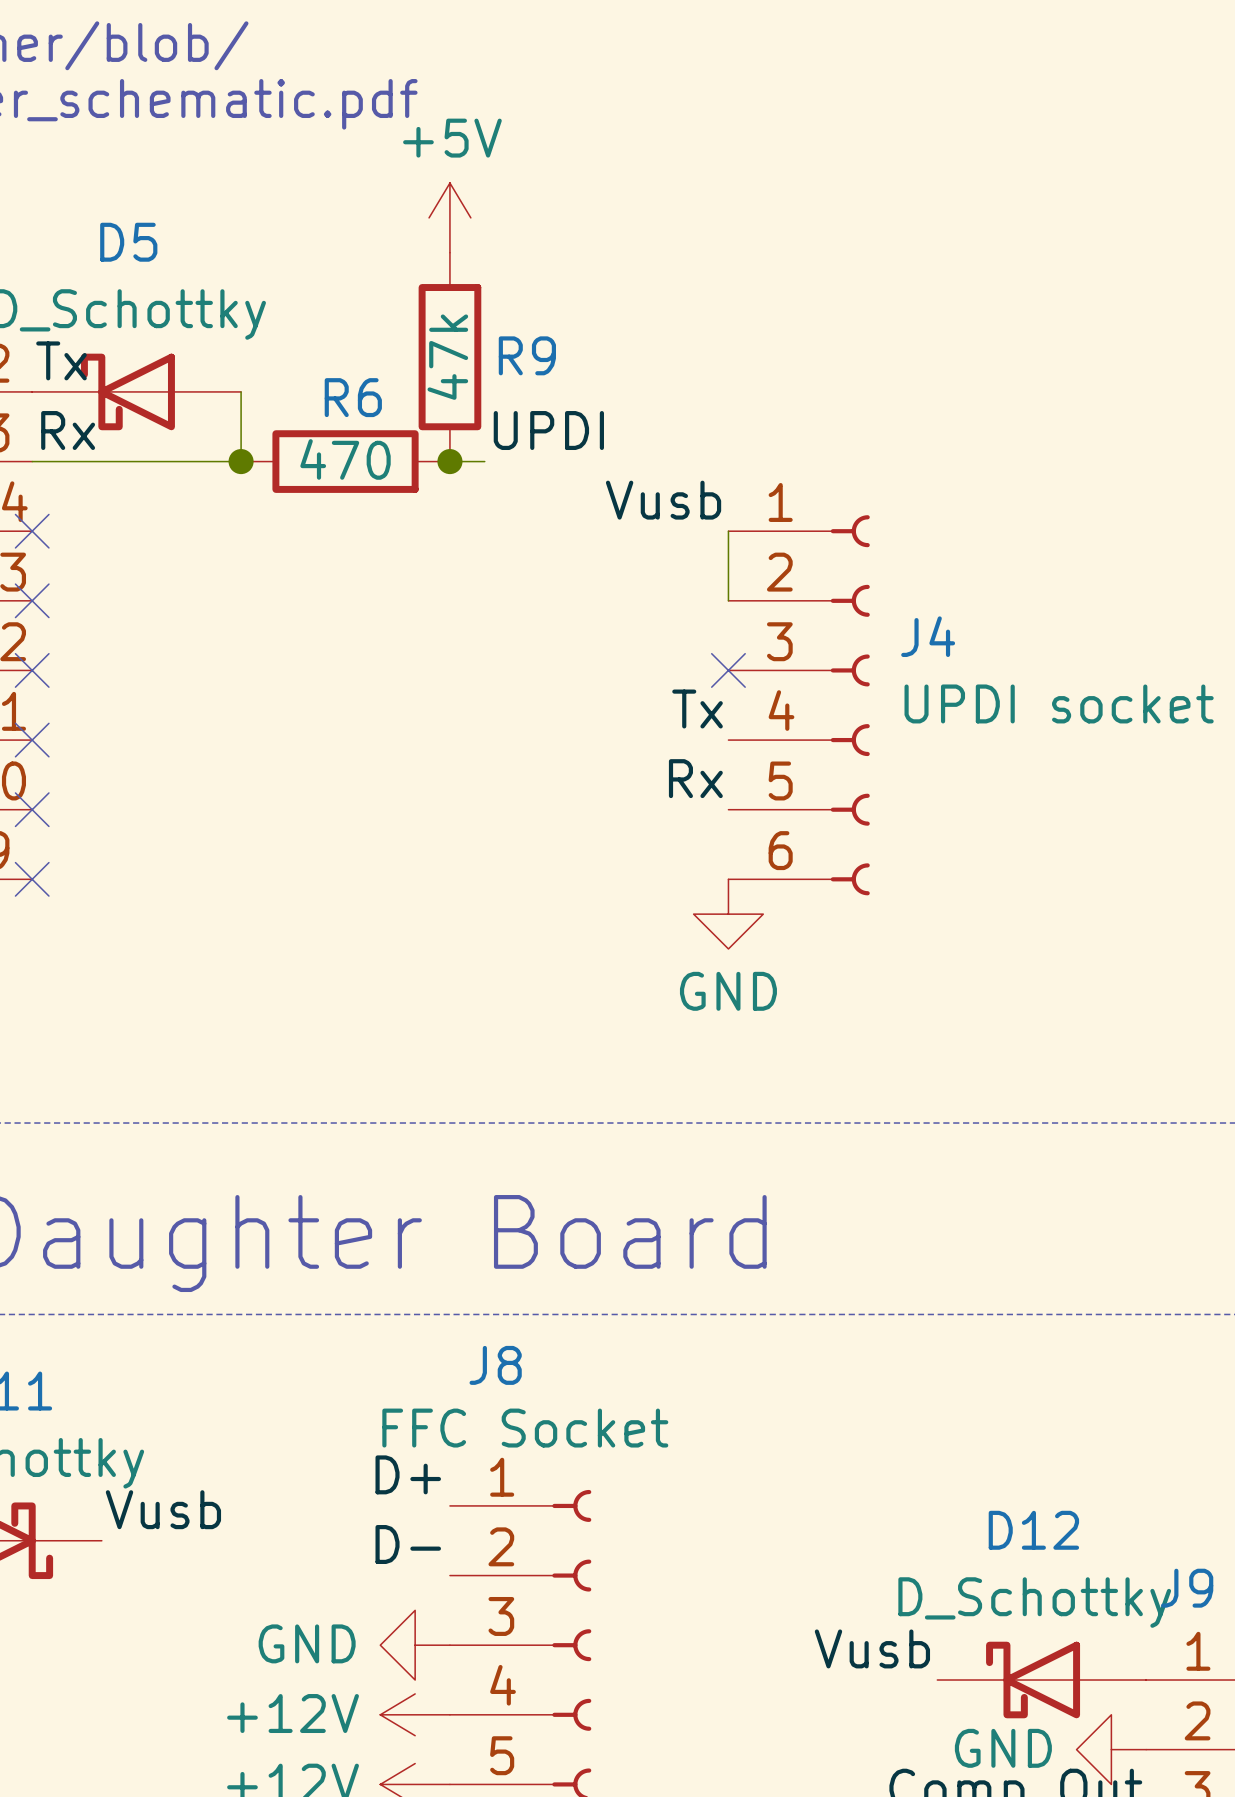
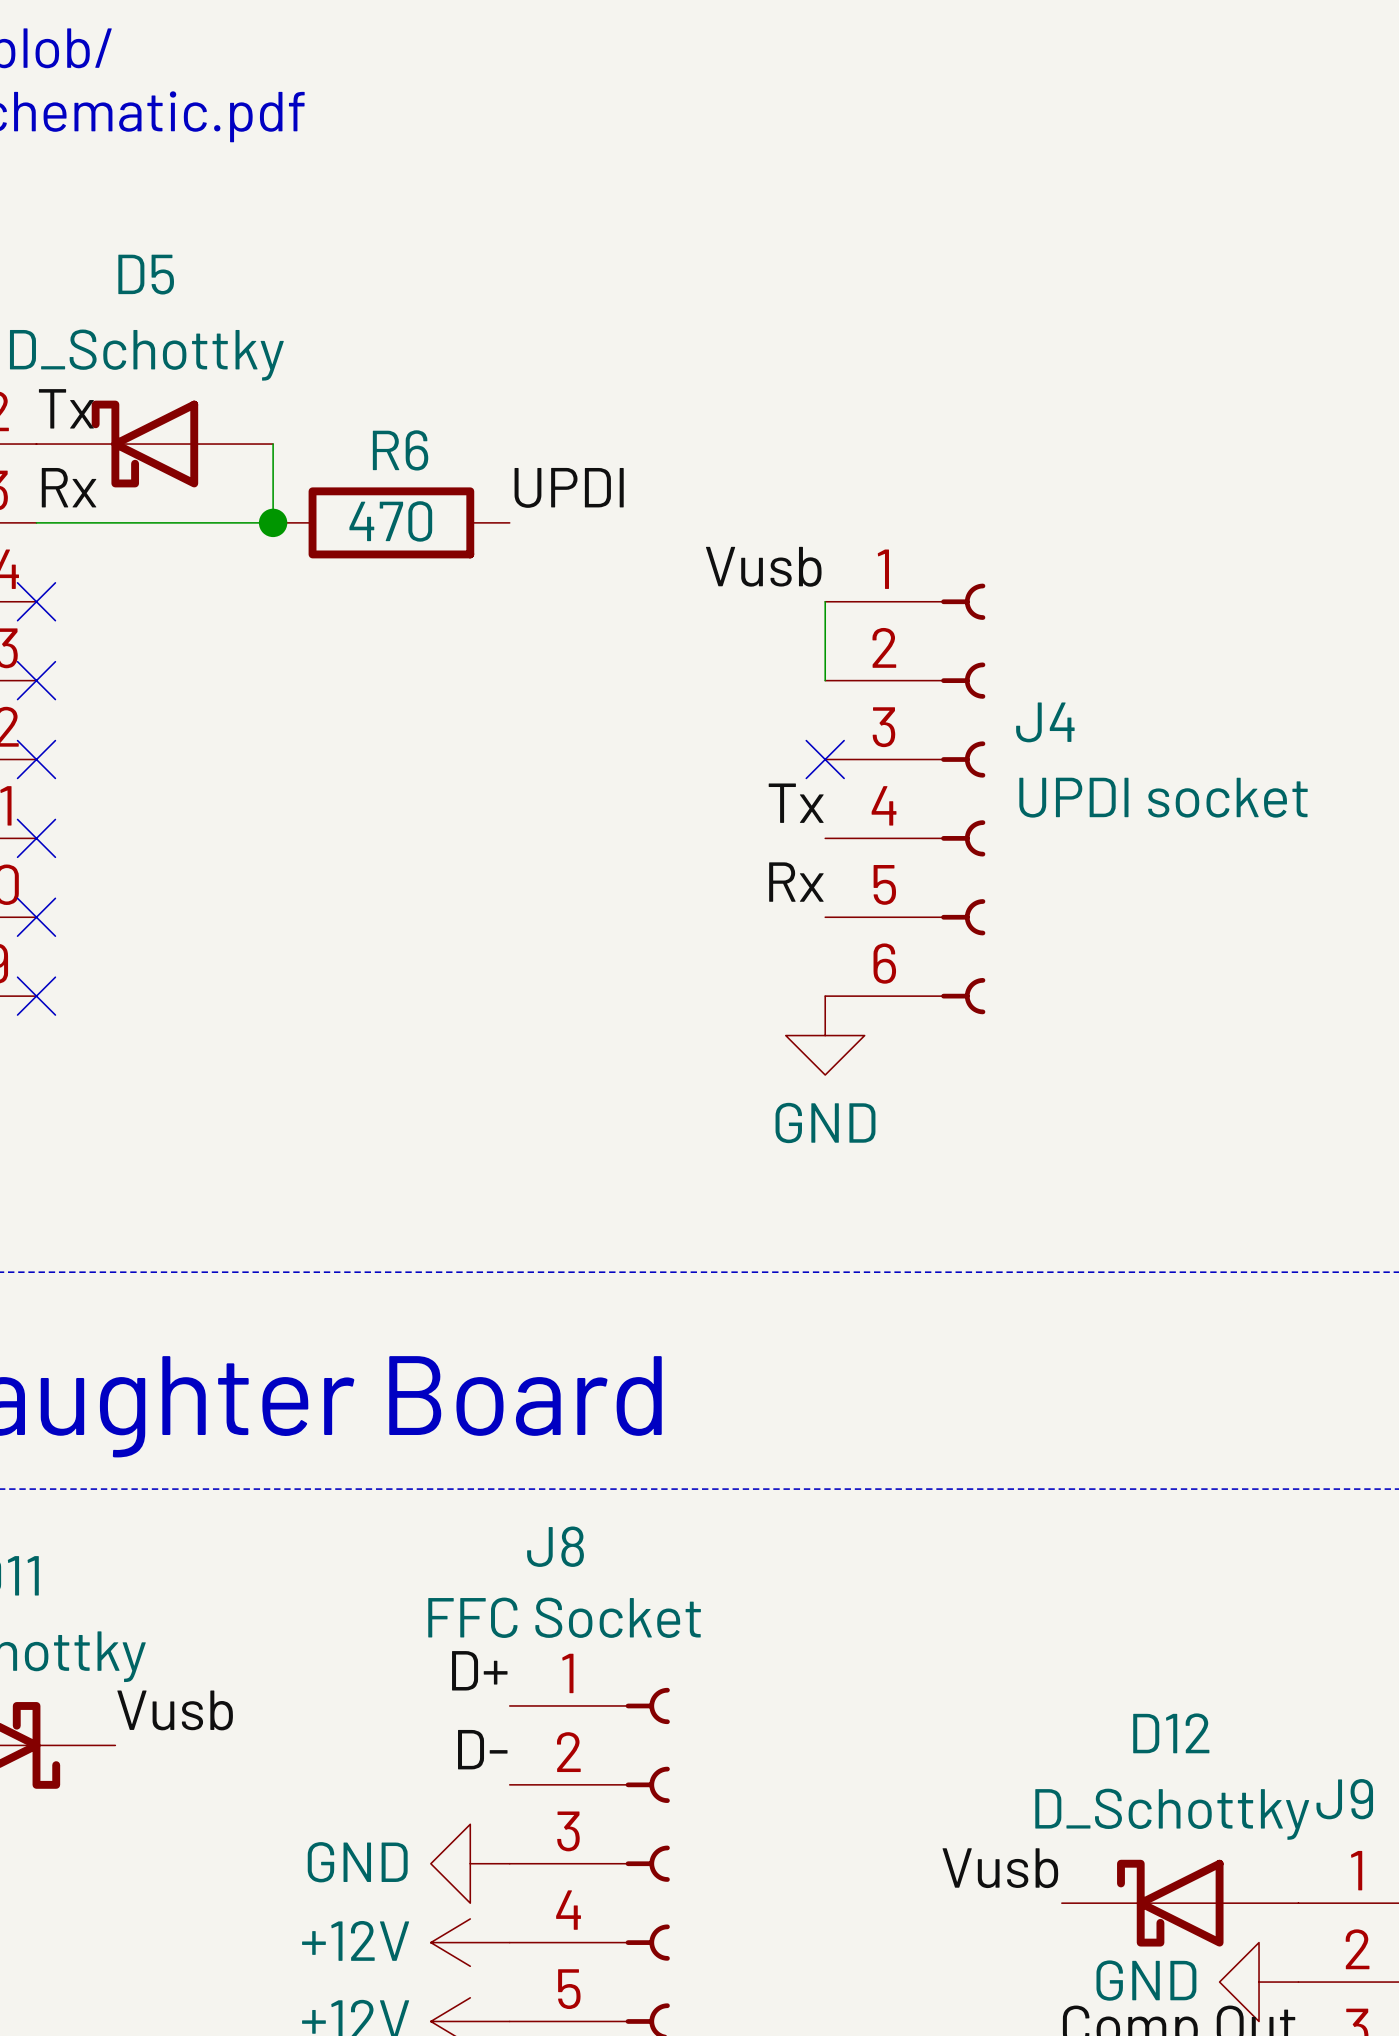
power symbol: +5V (449, 217) -> none
R9: 47k (449, 357) -> none
label position: UPDI (548, 430) -> UPDI (569, 487)
wire: (449, 461) (484, 461) -> none
junction: (449, 461) -> none

